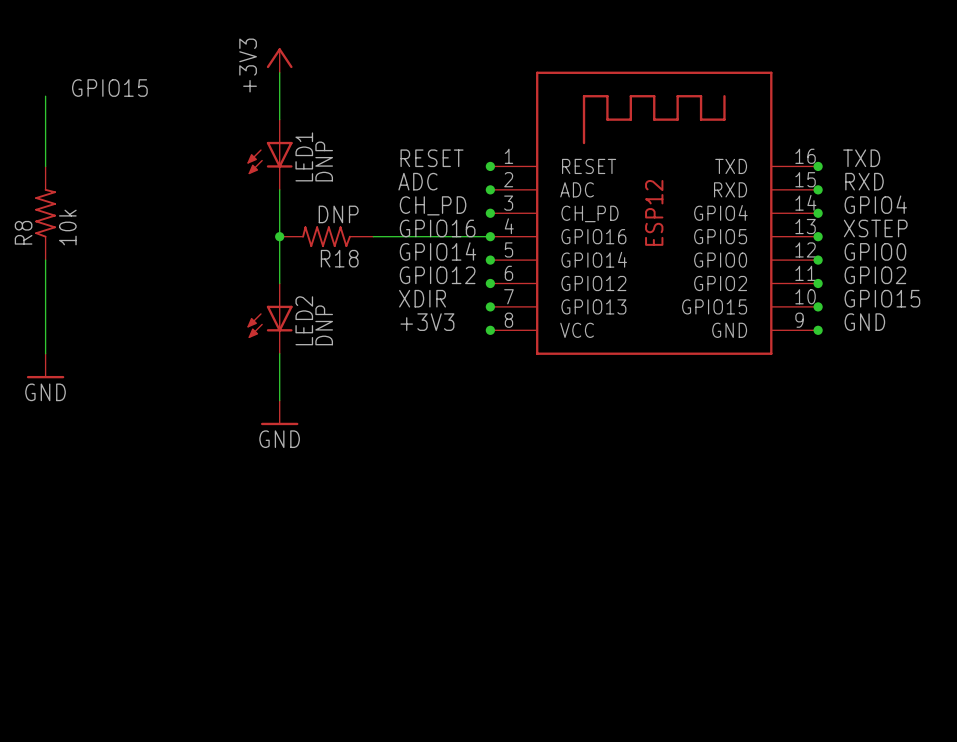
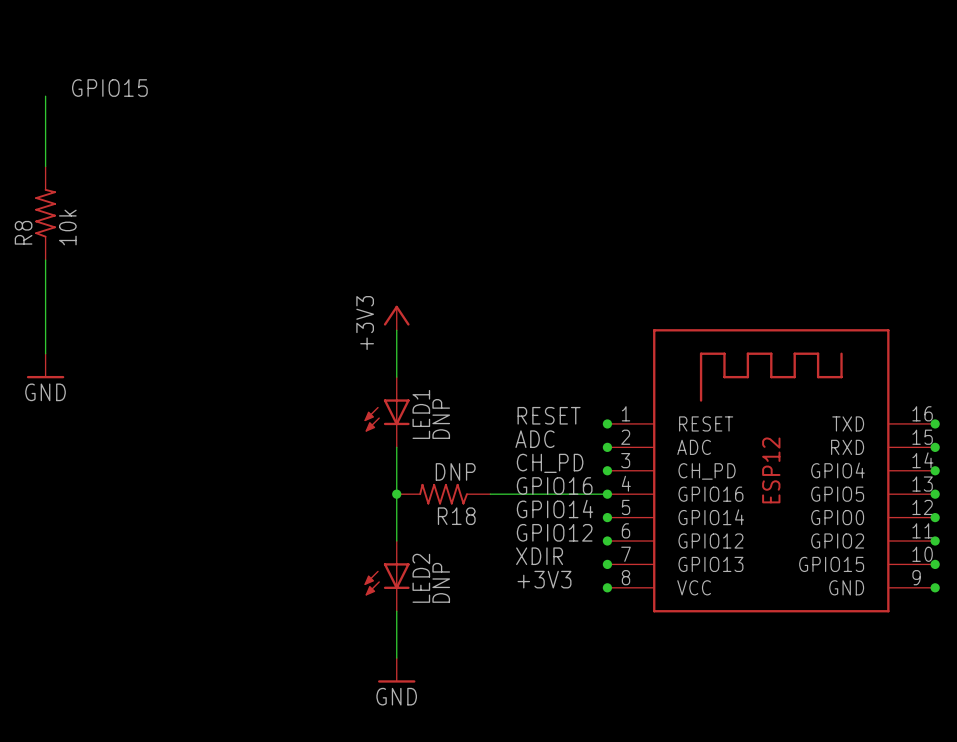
power symbol: +3V3 (279, 60) -> none
wire: (279, 72) (279, 119) -> none
LED1 position: (269, 154) -> (387, 412)
label: RESET (432, 158) -> none
label: TXD (861, 158) -> none
junction: (490, 166) -> none
junction: (818, 166) -> none
label: ADC (417, 181) -> none
label: RXD (864, 181) -> none
wire: (279, 189) (279, 283) -> none
junction: (490, 189) -> none
junction: (818, 189) -> none
label: GPIO4 (875, 204) -> none
label: CH_PD (433, 205) -> none
junction: (490, 213) -> none
part: (654, 213) -> none
junction: (818, 213) -> none
label: GPIO16 (437, 228) -> none
label: XSTEP (875, 228) -> none
junction: (279, 236) -> none
R18 position: (326, 236) -> (443, 494)
wire: (373, 236) (490, 236) -> none
junction: (490, 236) -> none
junction: (818, 236) -> none
label: GPIO14 (437, 251) -> none
label: GPIO0 (875, 251) -> none
junction: (490, 260) -> none
junction: (818, 260) -> none
label: GPIO12 (437, 275) -> none
label: GPIO2 (875, 275) -> none
junction: (490, 283) -> none
junction: (818, 283) -> none
label: XDIR (422, 298) -> none
label: GPIO15 (882, 298) -> none
junction: (490, 306) -> none
junction: (818, 306) -> none
LED2 position: (269, 318) -> (387, 576)
power symbol: none -> +3V3 (396, 318)
label: +3V3 (427, 322) -> none
label: GND (864, 322) -> none
junction: (490, 330) -> none
junction: (818, 330) -> none
wire: (279, 353) (279, 400) -> (396, 330) (396, 377)
power symbol: GND (279, 412) -> none
label: none -> RESET (549, 415)
junction: none -> (607, 423)
junction: none -> (935, 423)
label: none -> ADC (535, 439)
wire: none -> (396, 447) (396, 541)
junction: none -> (607, 447)
junction: none -> (935, 447)
label: none -> CH_PD (550, 463)
junction: none -> (607, 470)
part: none -> (771, 470)
junction: none -> (935, 470)
label: none -> GPIO16 (554, 485)
junction: none -> (396, 494)
wire: none -> (490, 494) (607, 494)
junction: none -> (607, 494)
junction: none -> (935, 494)
label: none -> GPIO14 (555, 509)
junction: none -> (607, 517)
junction: none -> (935, 517)
label: none -> GPIO12 (554, 532)
junction: none -> (607, 541)
junction: none -> (935, 541)
label: none -> XDIR (539, 556)
junction: none -> (607, 564)
junction: none -> (935, 564)
label: none -> +3V3 (544, 579)
junction: none -> (607, 587)
junction: none -> (935, 587)
wire: none -> (396, 611) (396, 658)
power symbol: none -> GND (396, 670)

